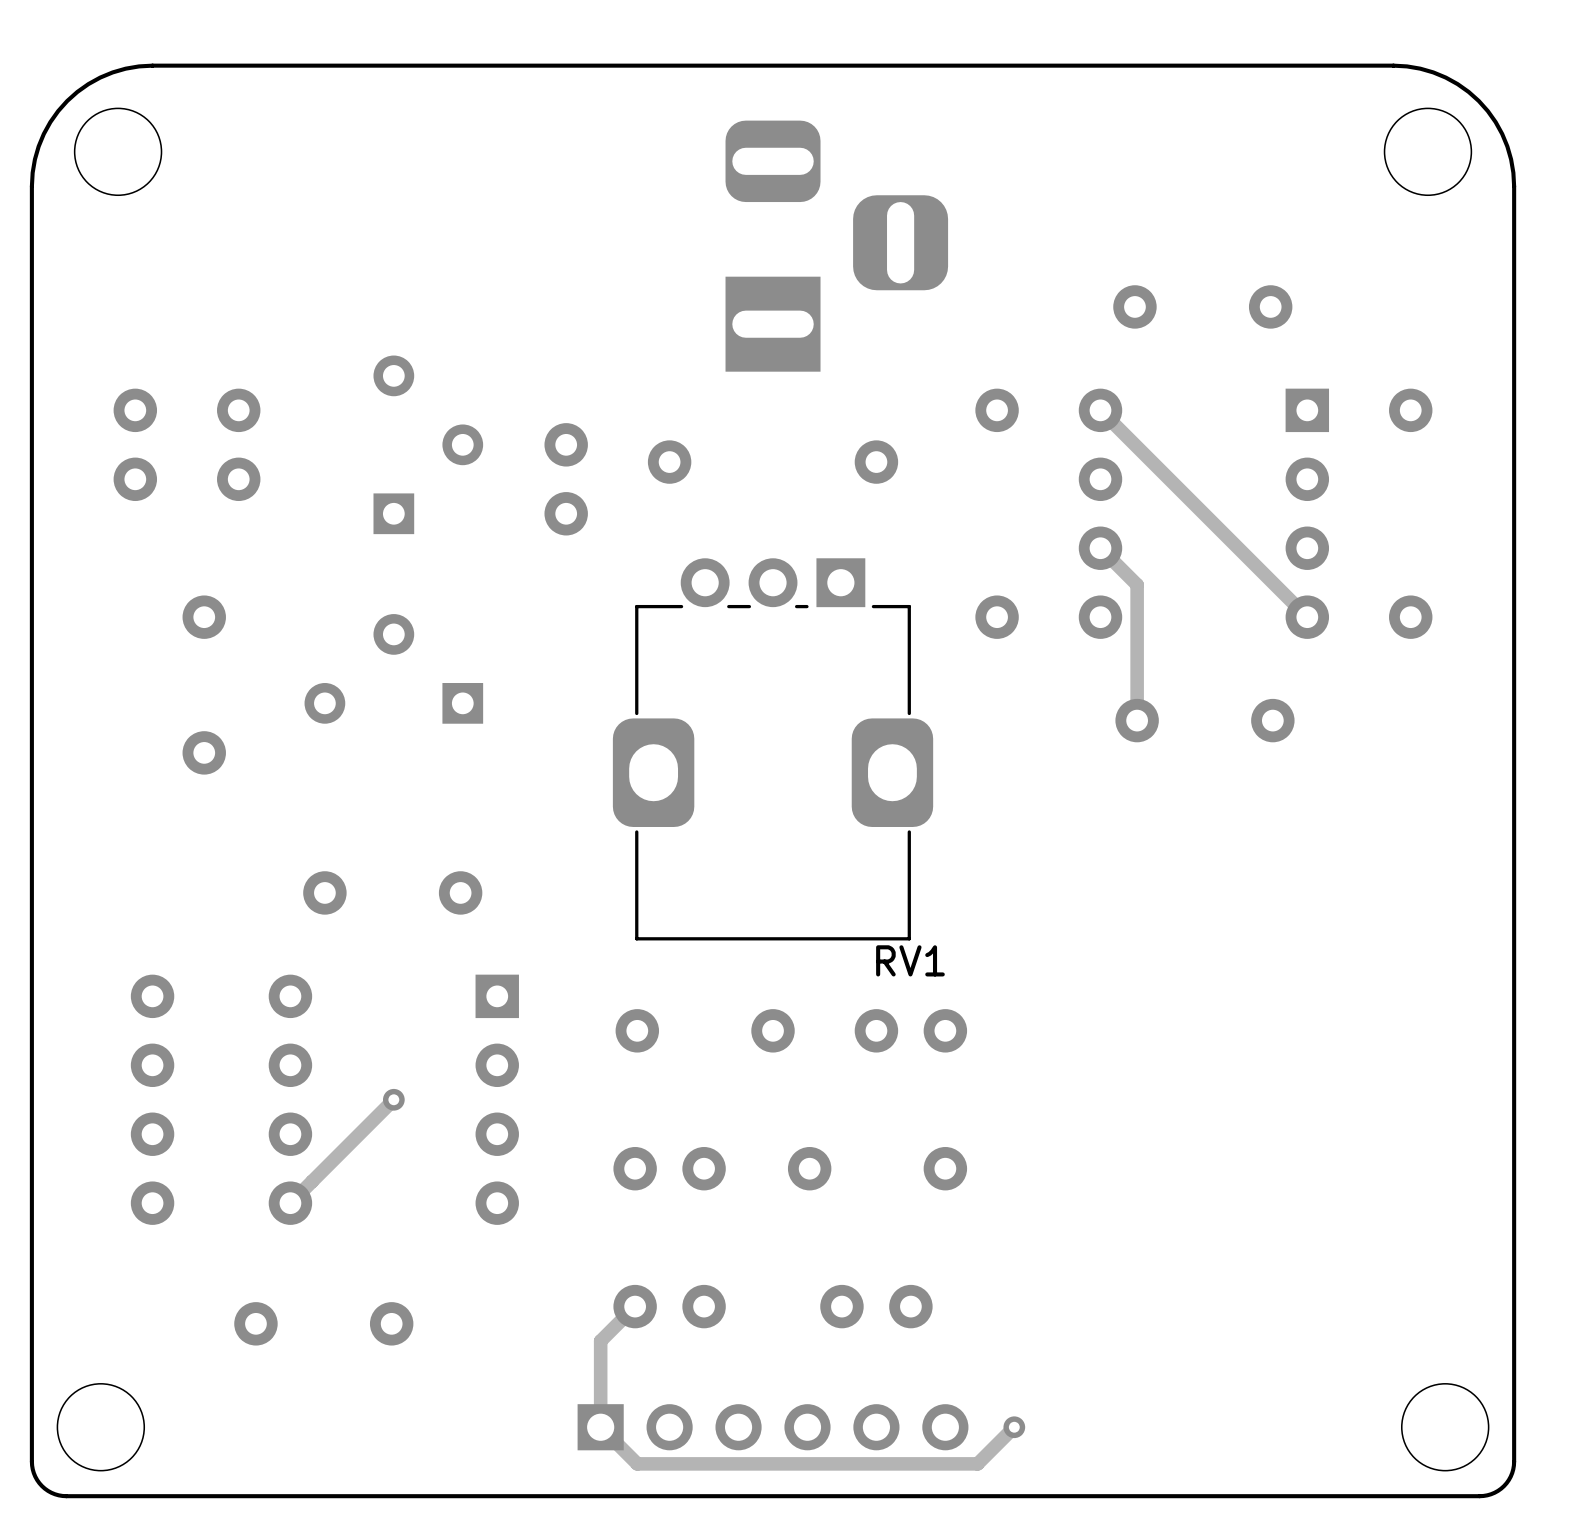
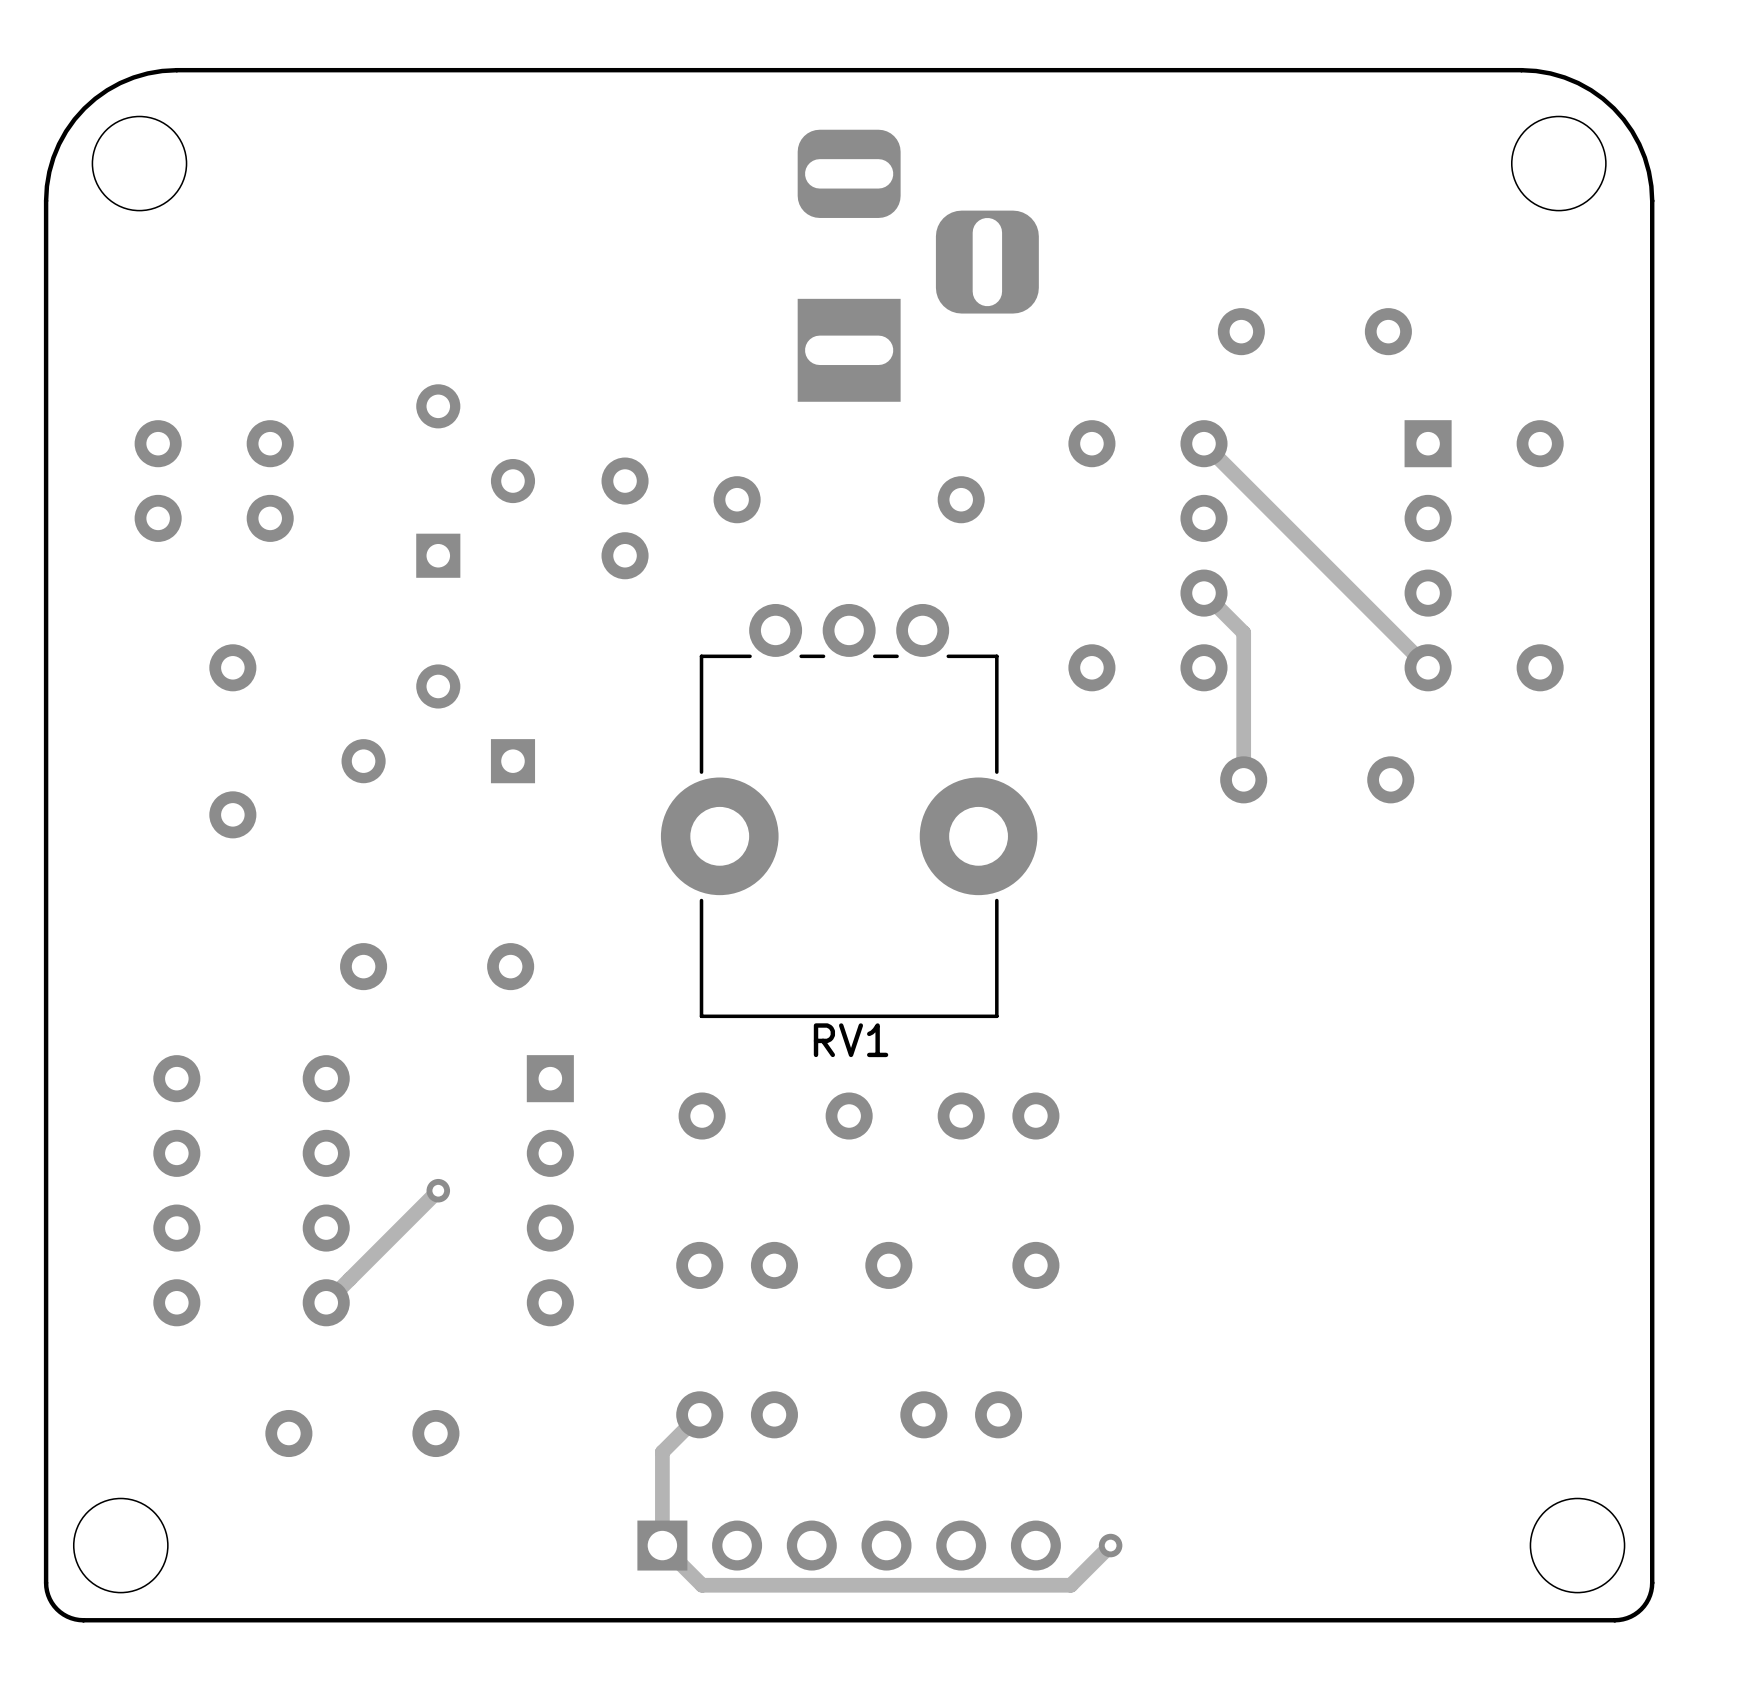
RV1 footprint: [612, 558, 934, 941] -> [660, 603, 1038, 1019]
RV1 name position: RV1 (910, 960) -> RV1 (851, 1040)

